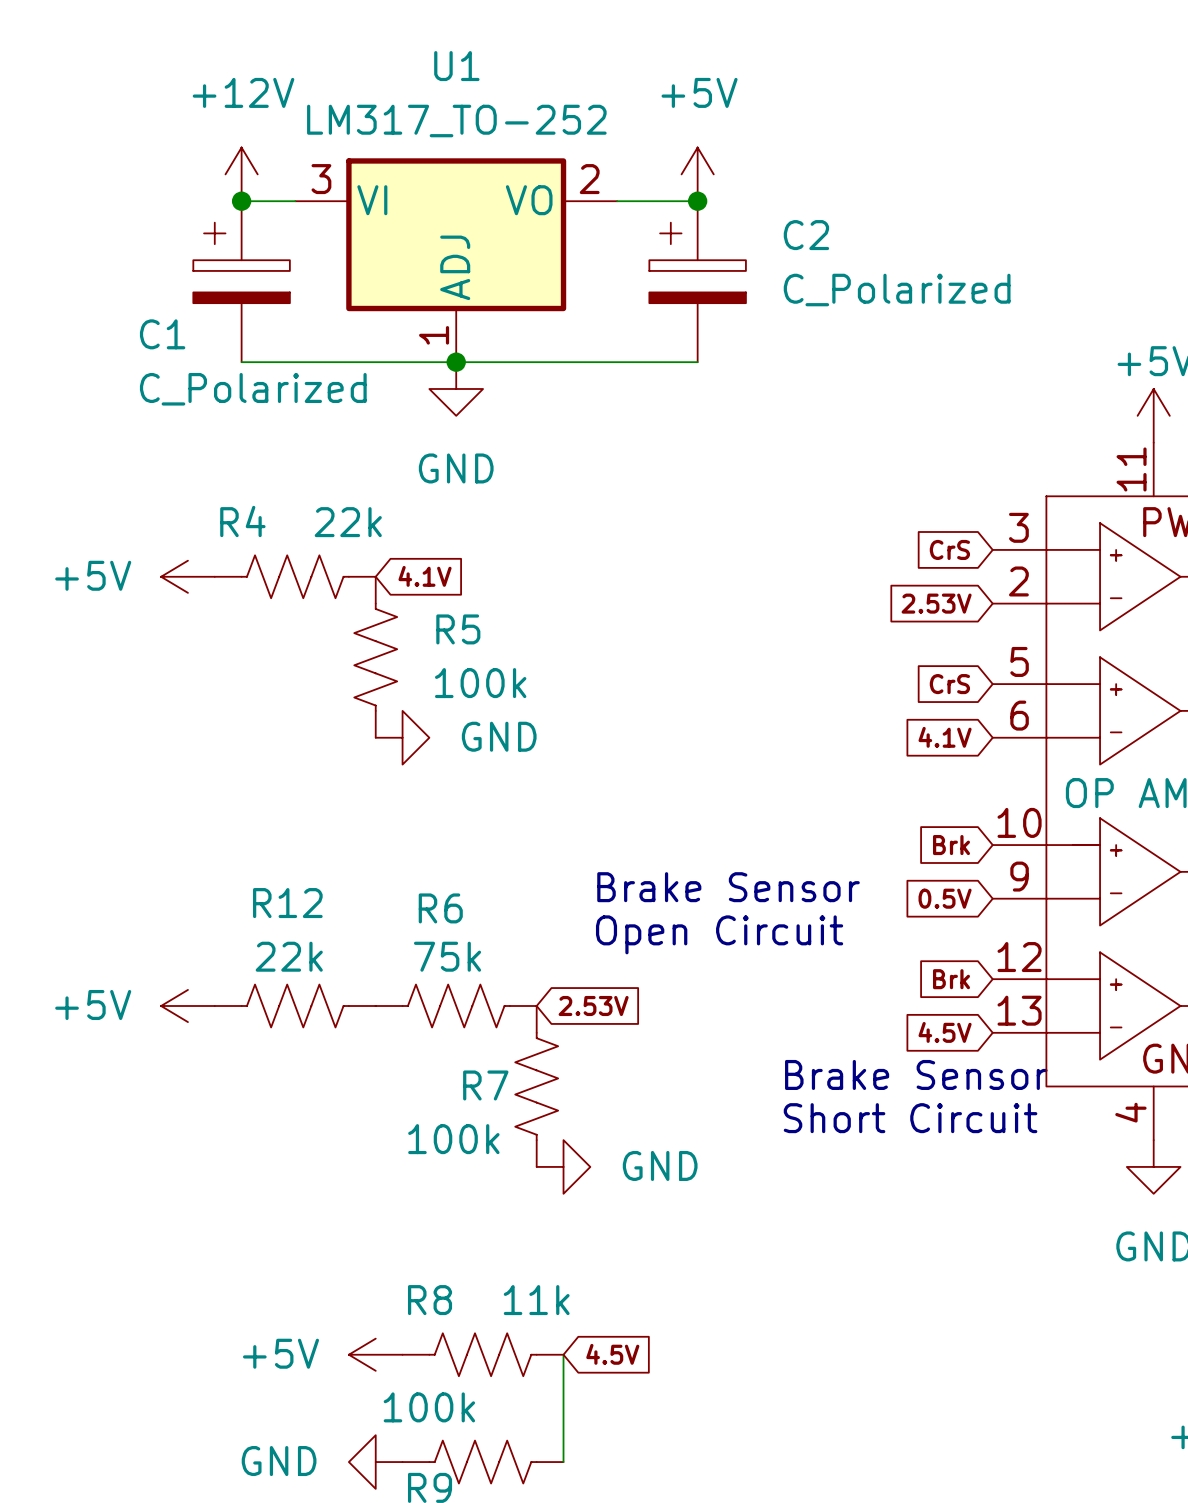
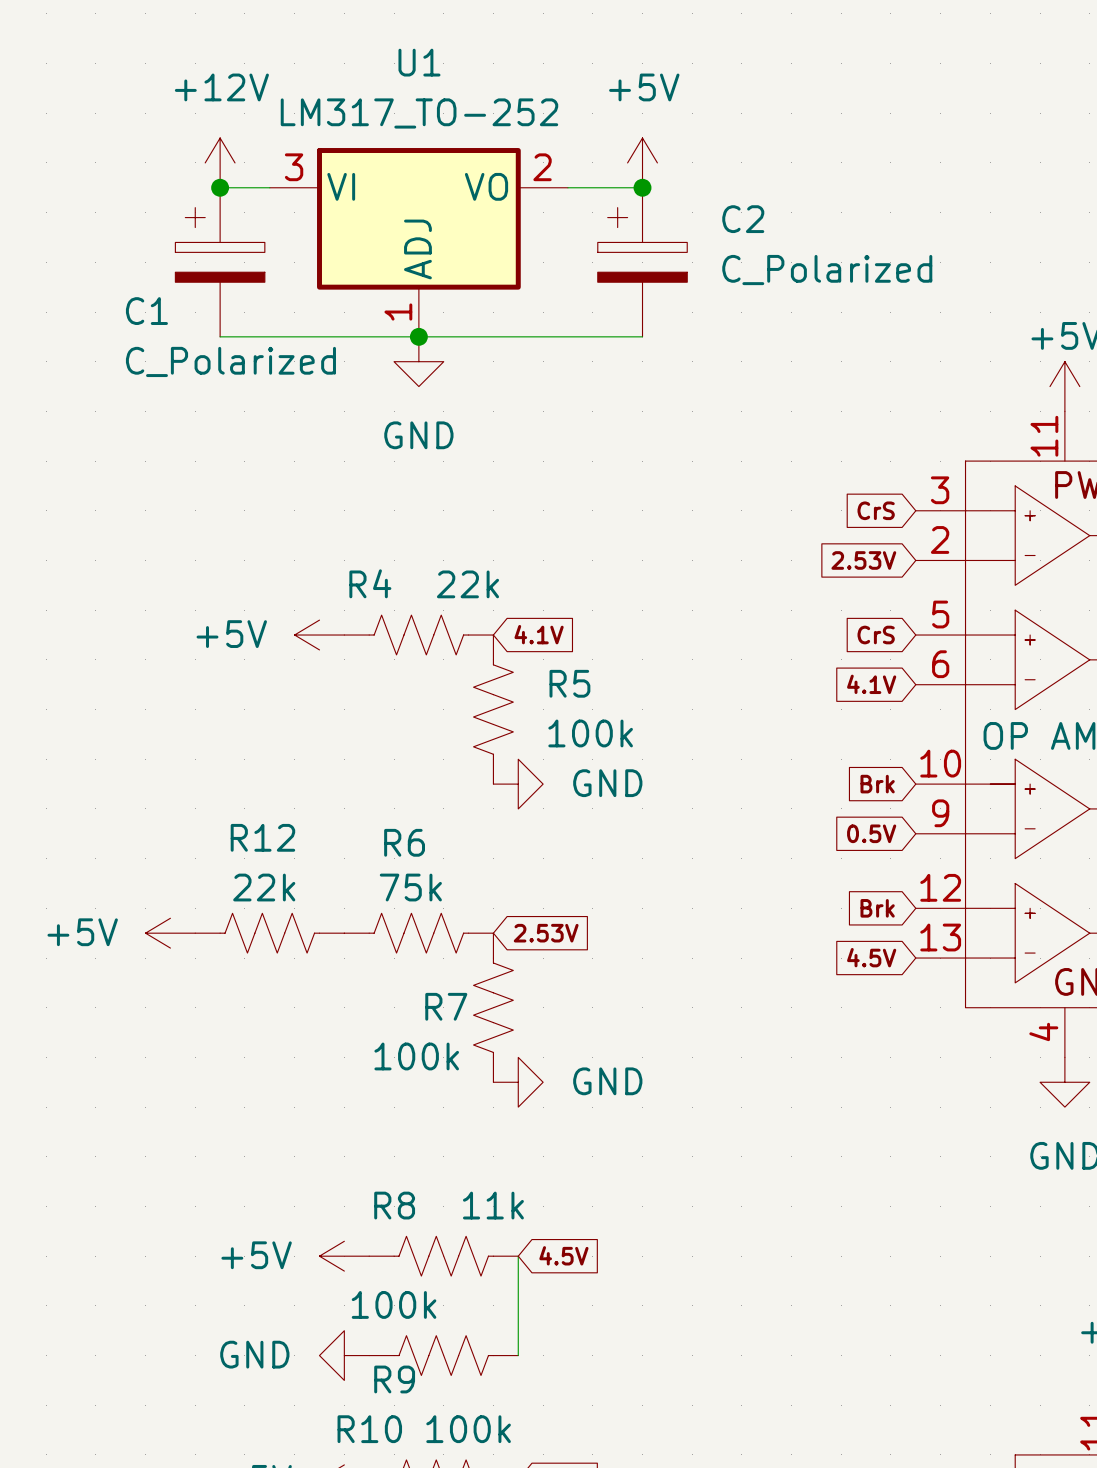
power symbol position: +5V (187, 576) -> +5V (319, 635)
R4 position: (295, 576) -> (418, 635)
global label position: 4.1V (425, 576) -> 4.1V (539, 634)
R5 position: (375, 657) -> (493, 709)
power symbol position: GND (402, 737) -> GND (518, 784)
text: Brake Sensor (728, 887) -> none
text: Open Circuit (719, 934) -> none
text: Brake Sensor (916, 1074) -> none
text: Short Circuit (910, 1118) -> none

